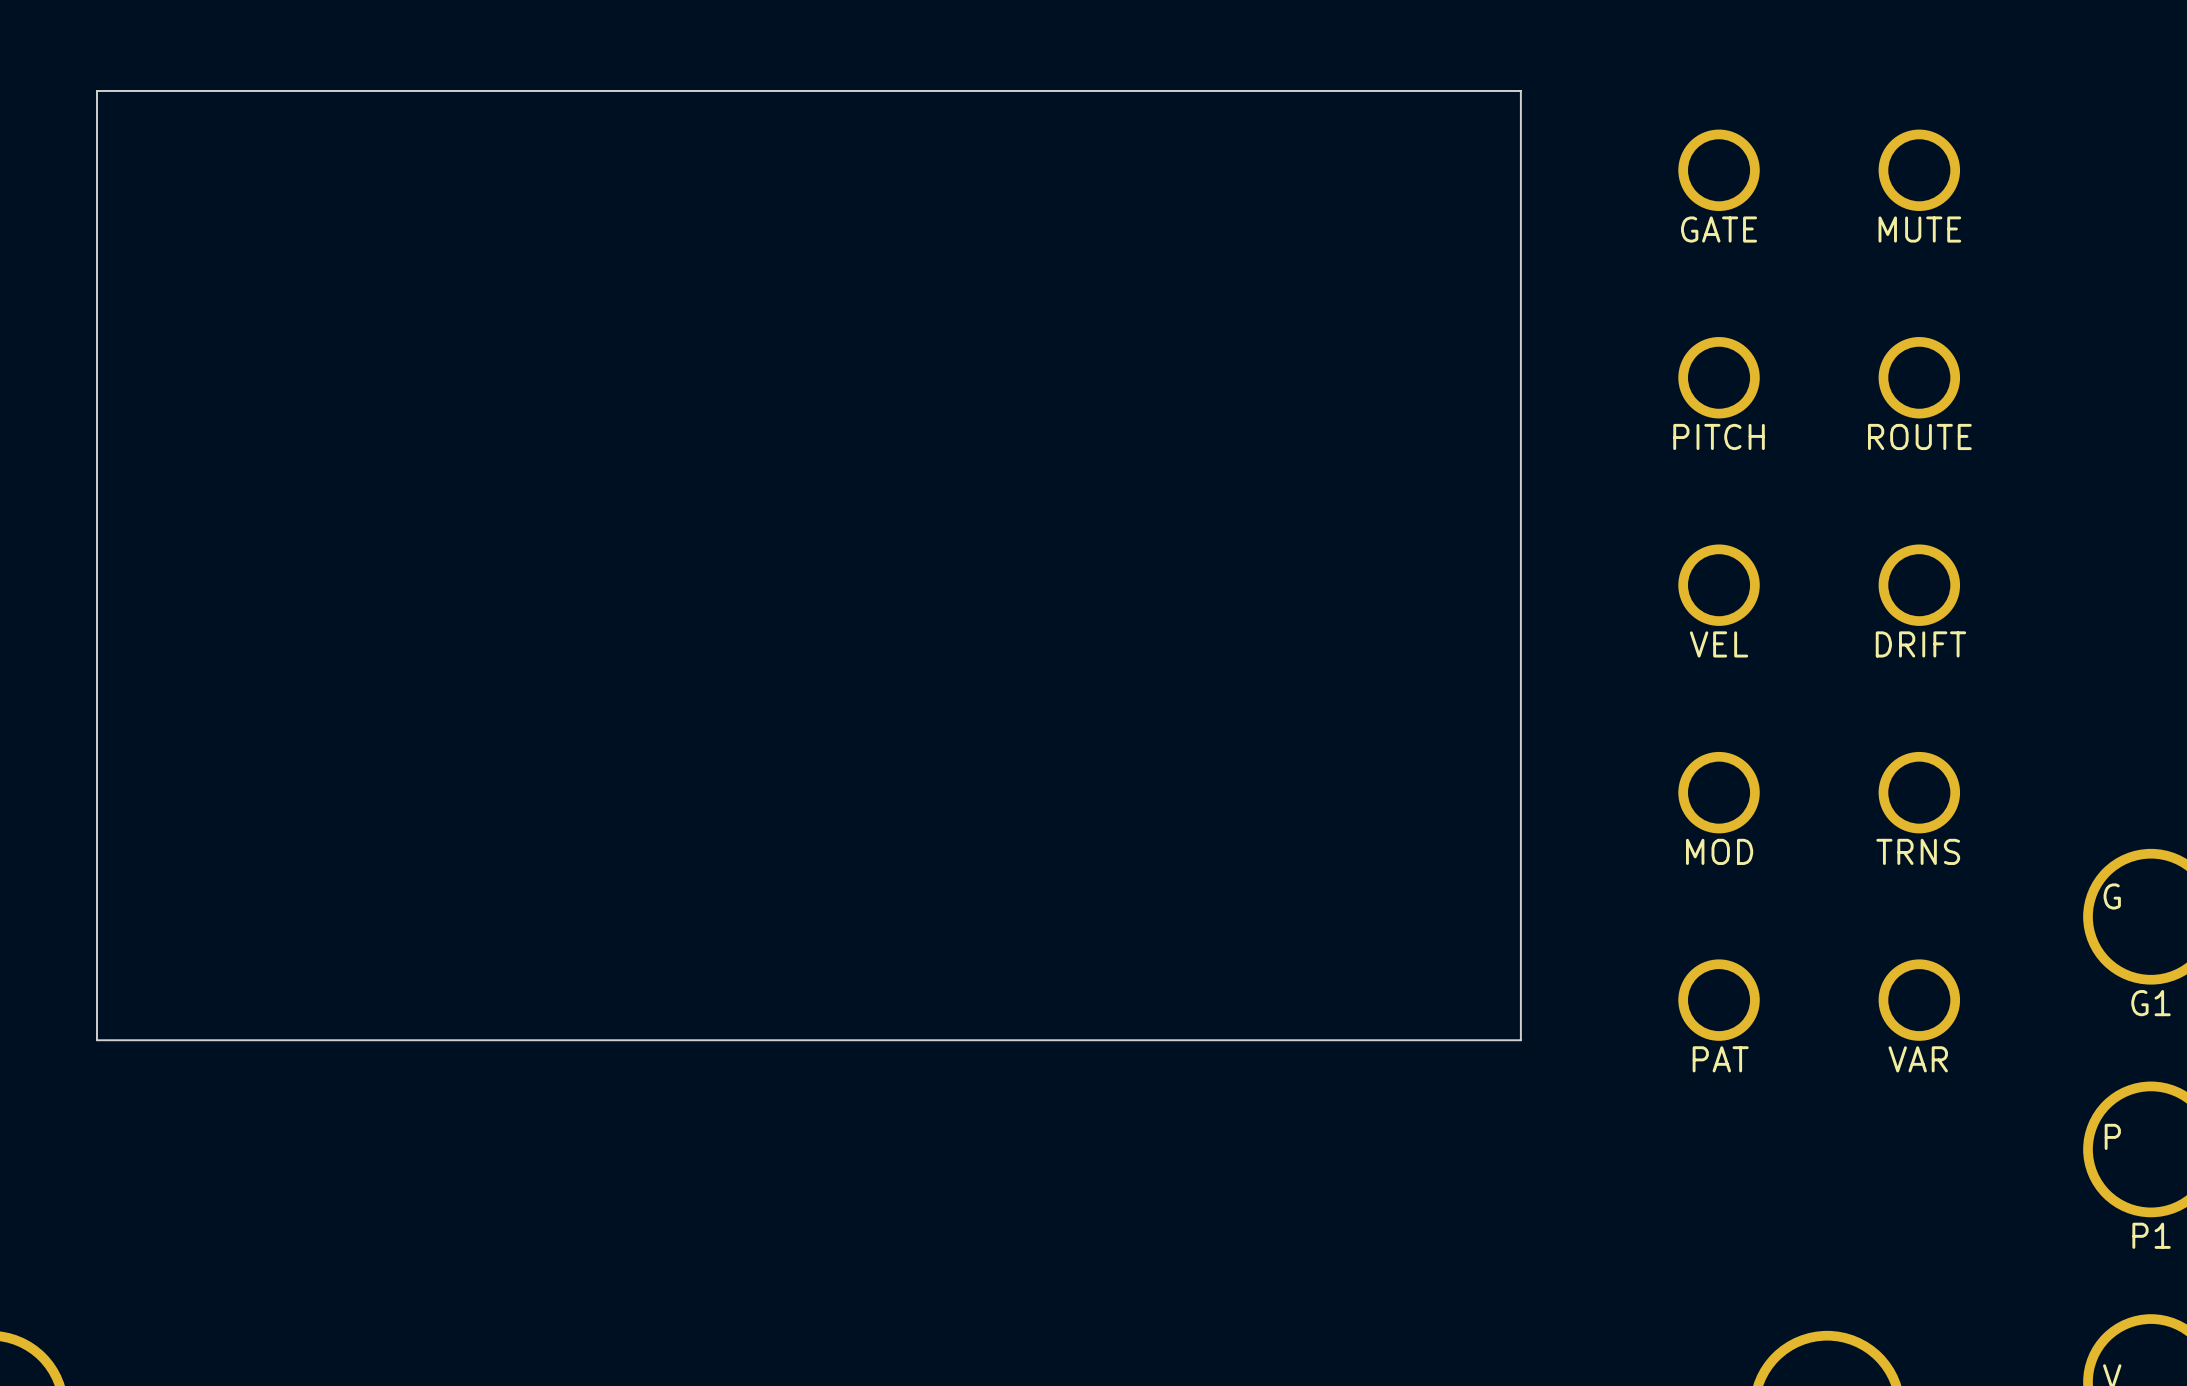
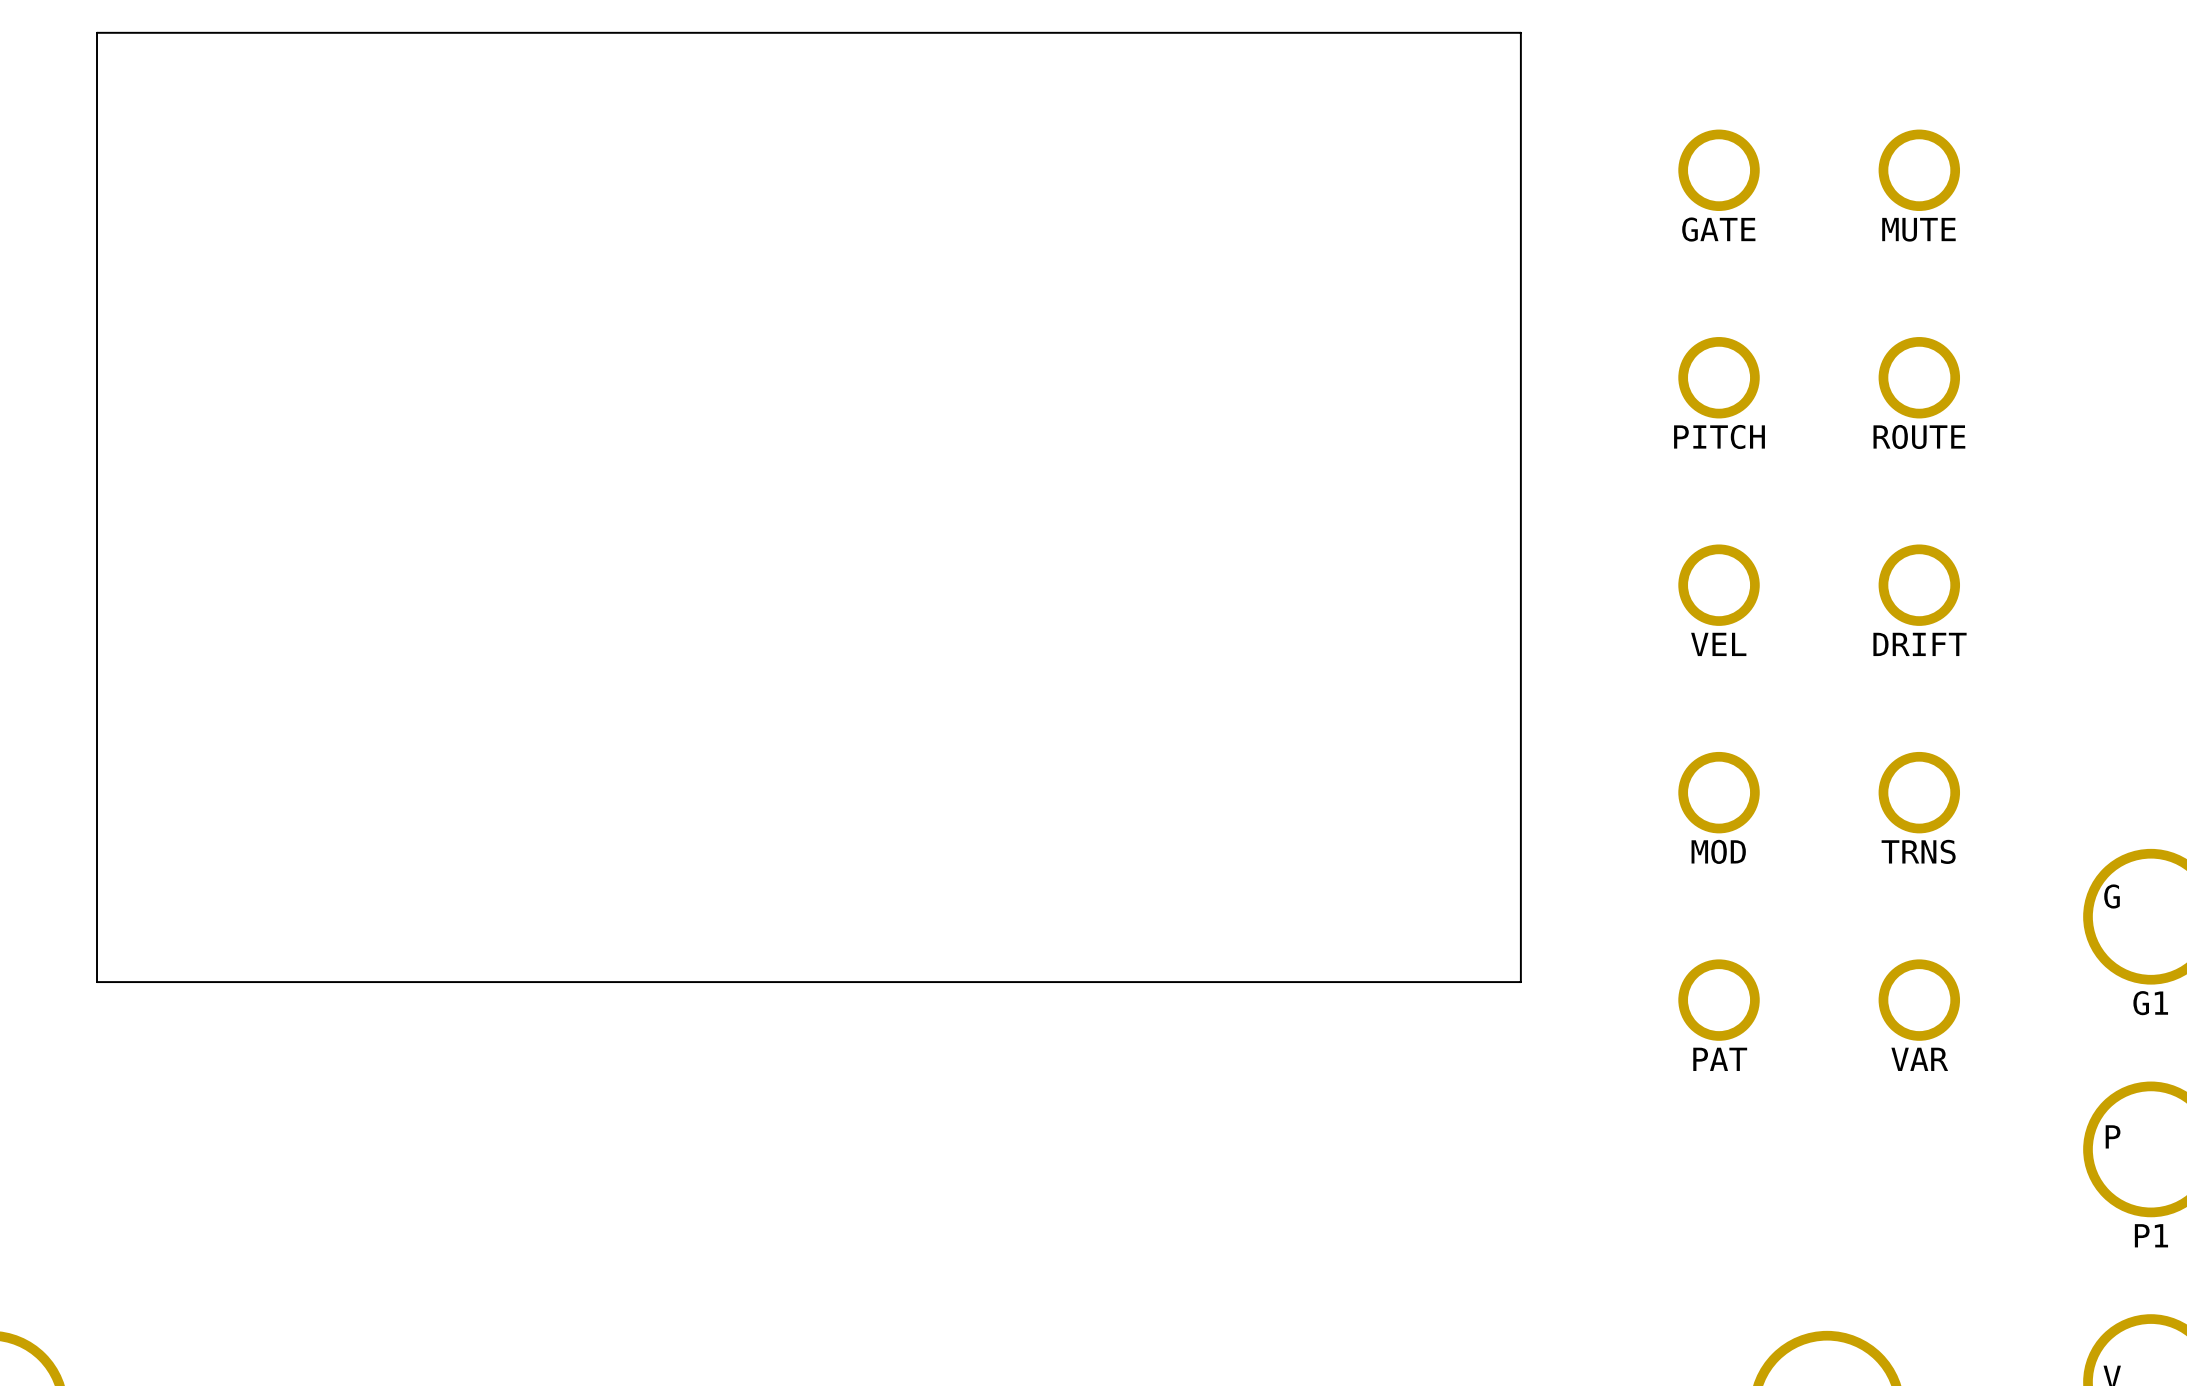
board edge: (97, 90) (1520, 90) -> (97, 90) (97, 32) (1520, 32) (1520, 90)
board edge: (97, 982) (97, 1040) (1520, 1040) (1520, 982) -> (97, 982) (1520, 982)

